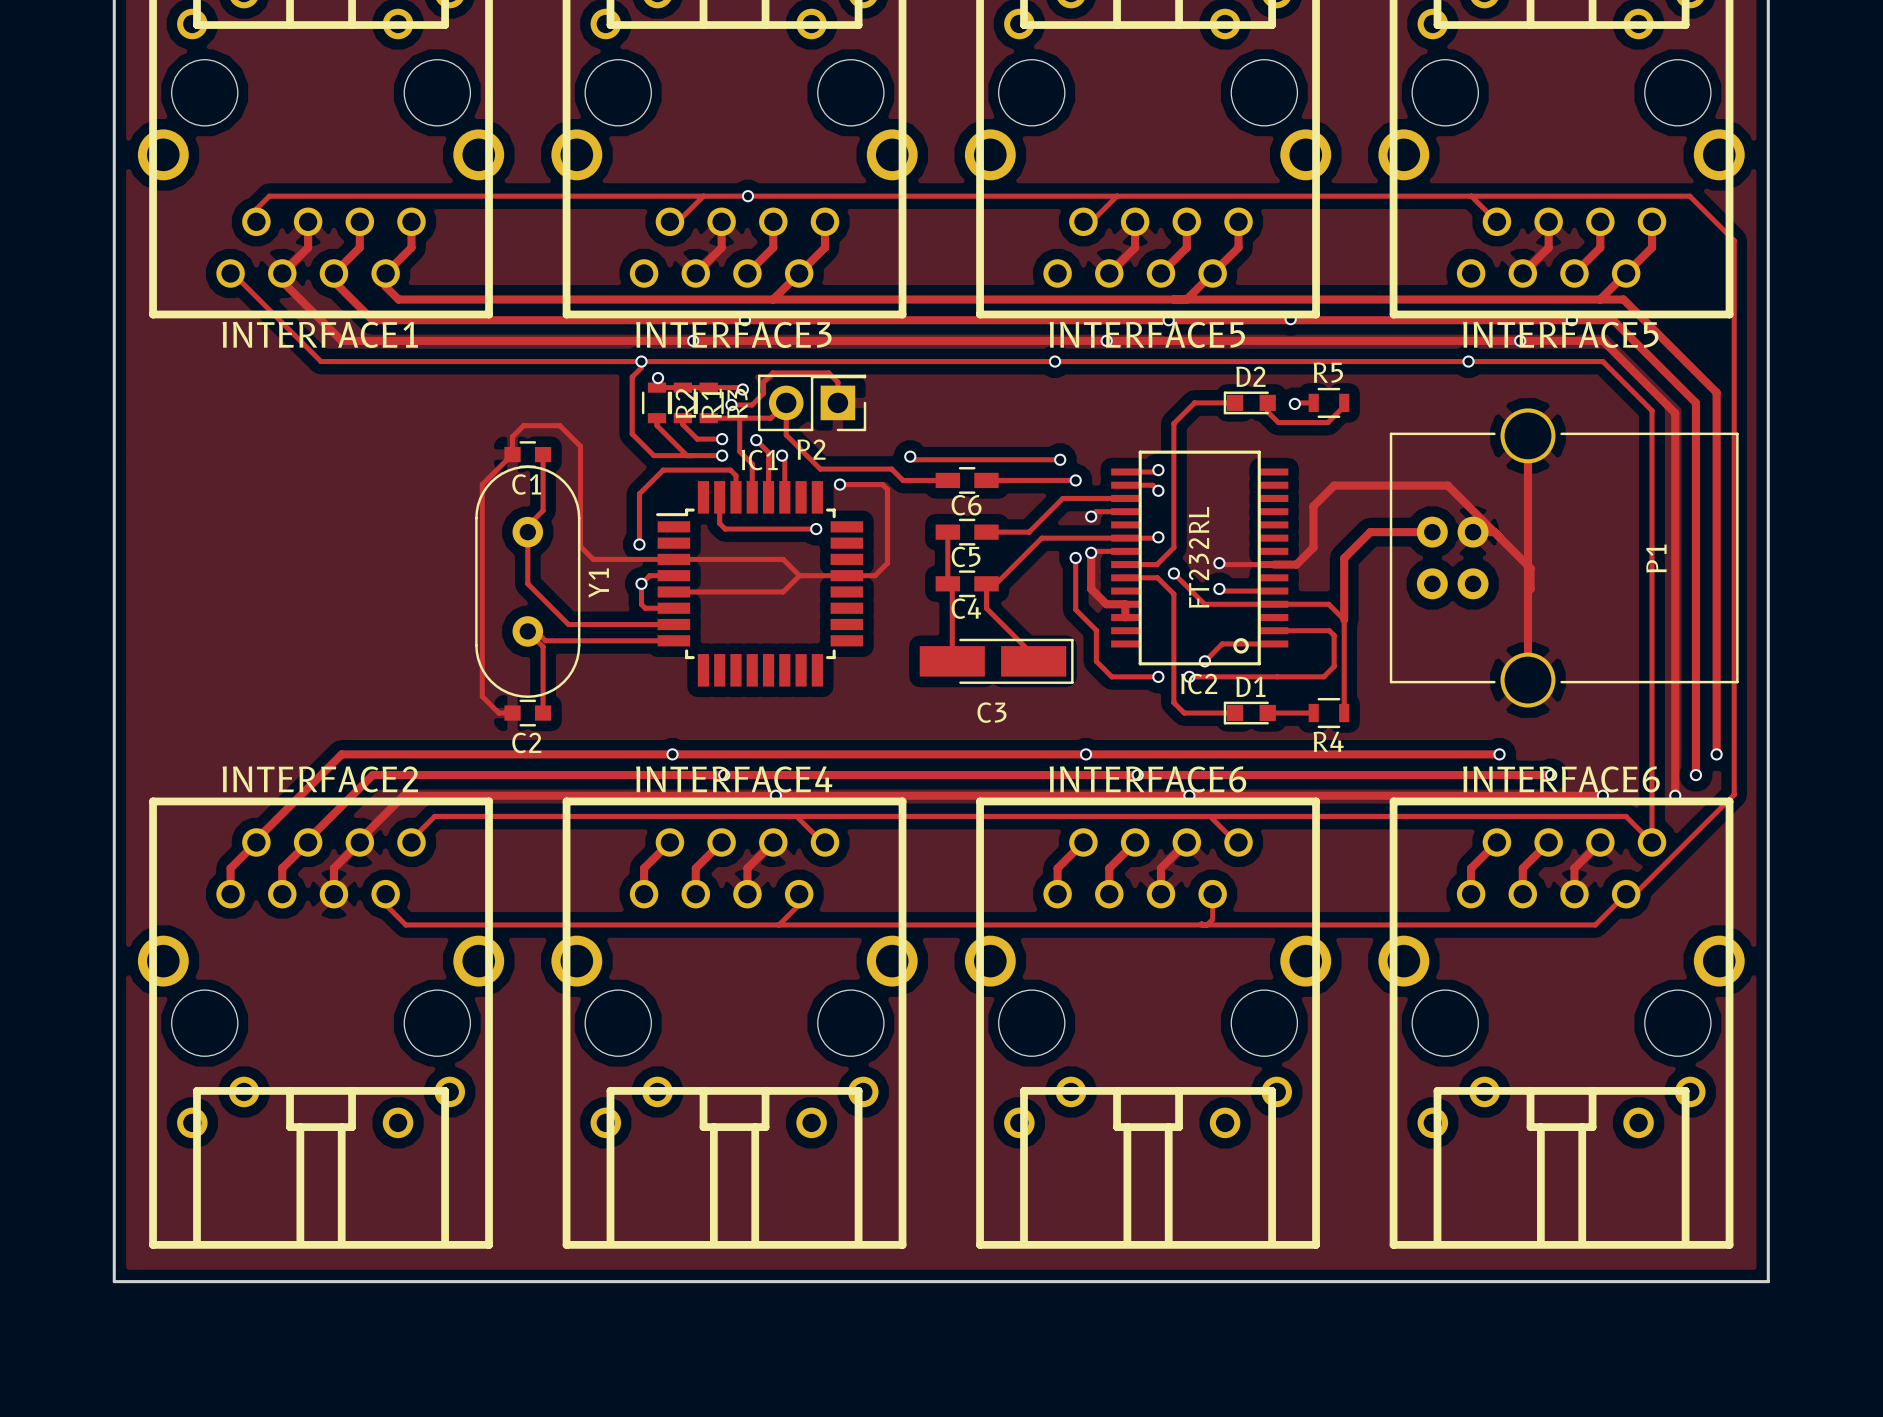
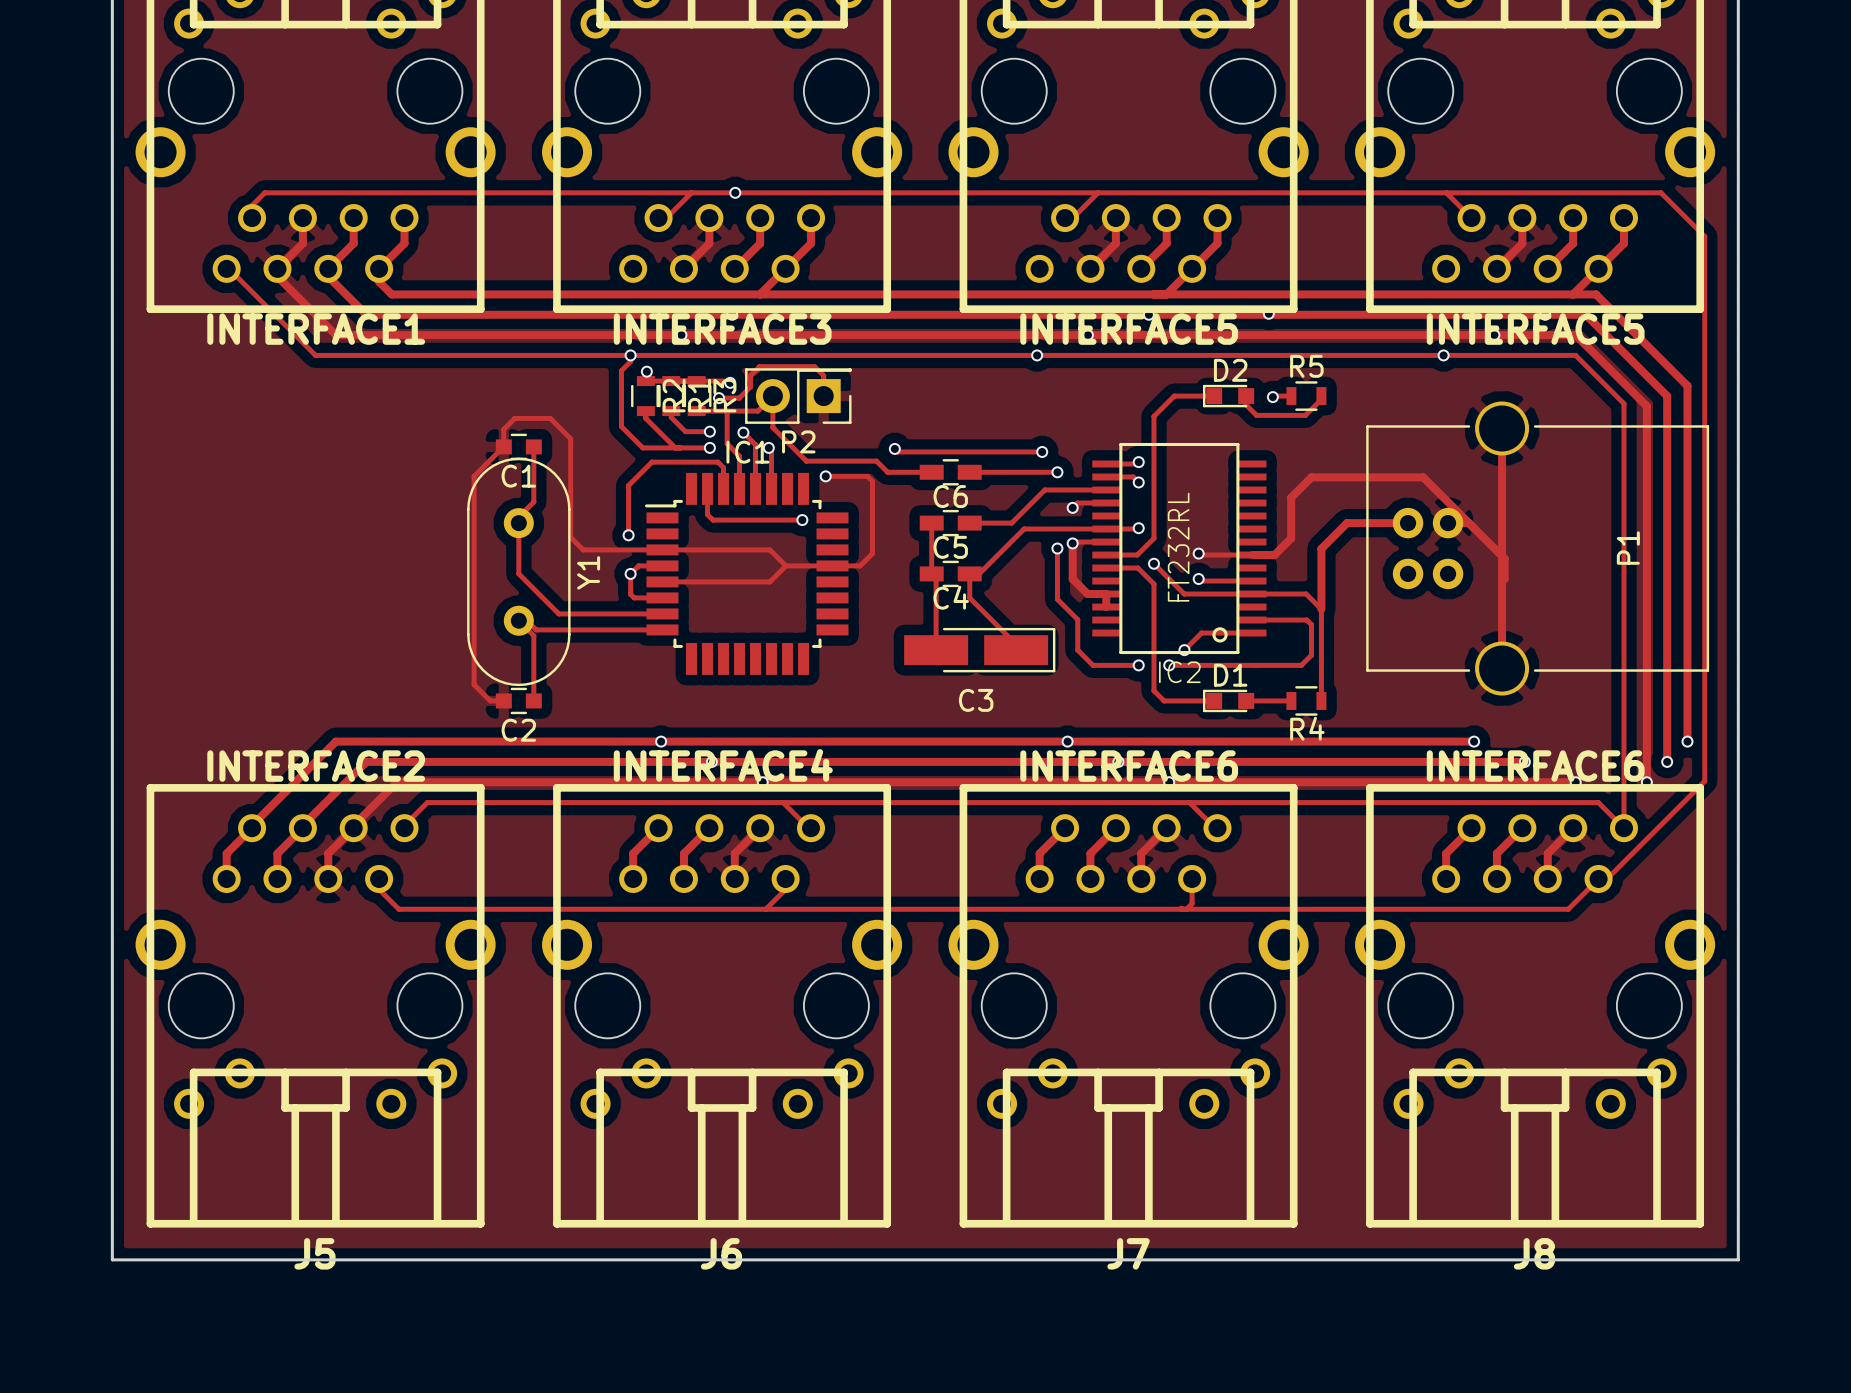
J5 name: none -> J5 (314, 1253)
J6 name: none -> J6 (721, 1253)
J7 name: none -> J7 (1128, 1253)
J8 name: none -> J8 (1534, 1253)

